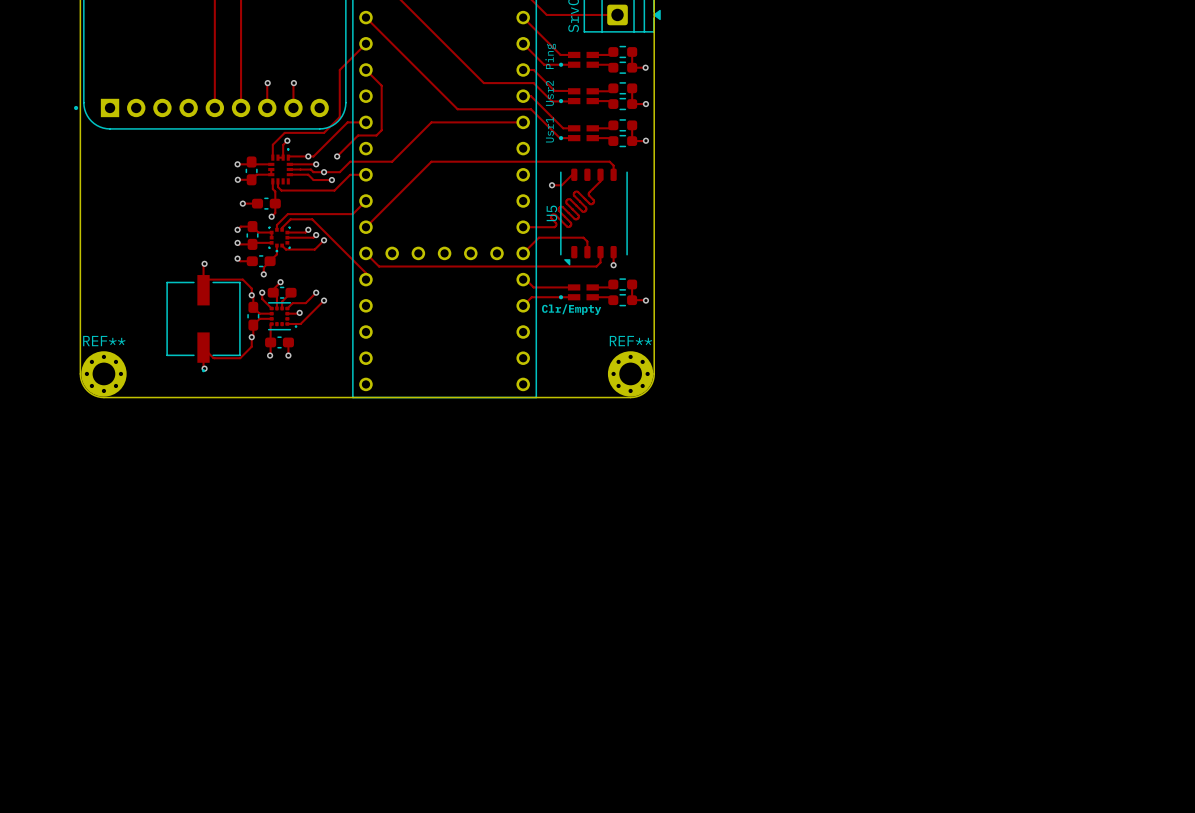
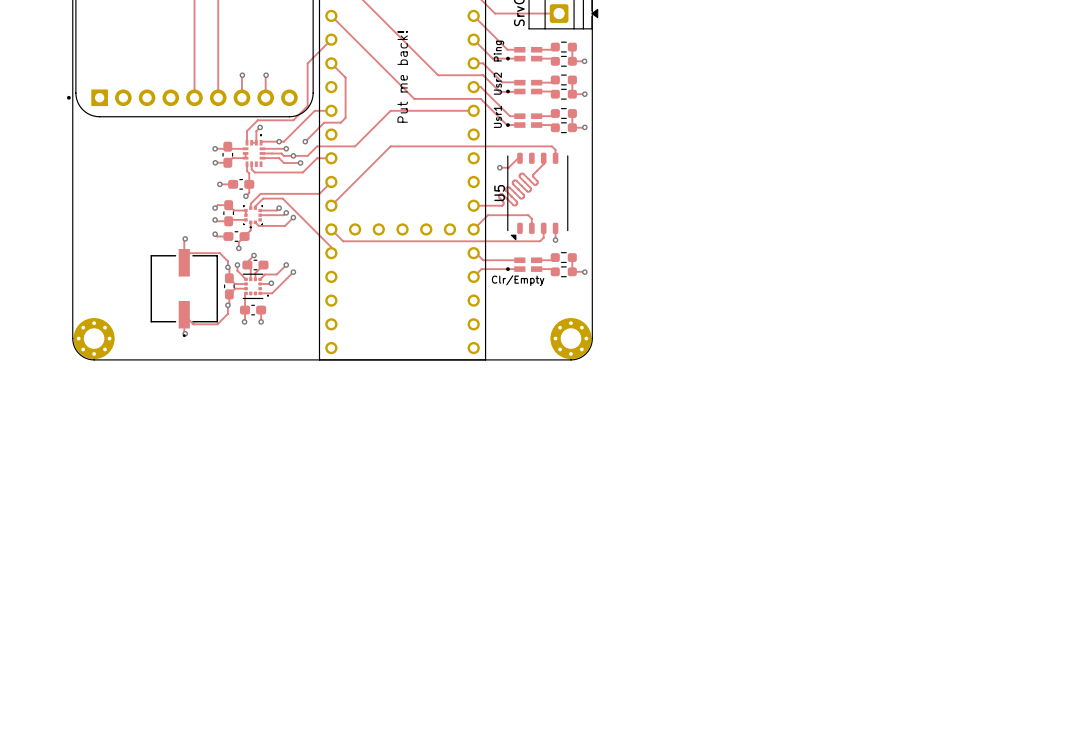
text: none -> Put me back! (402, 76)
REF** name: REF** (104, 341) -> none
REF** name: REF** (630, 341) -> none

